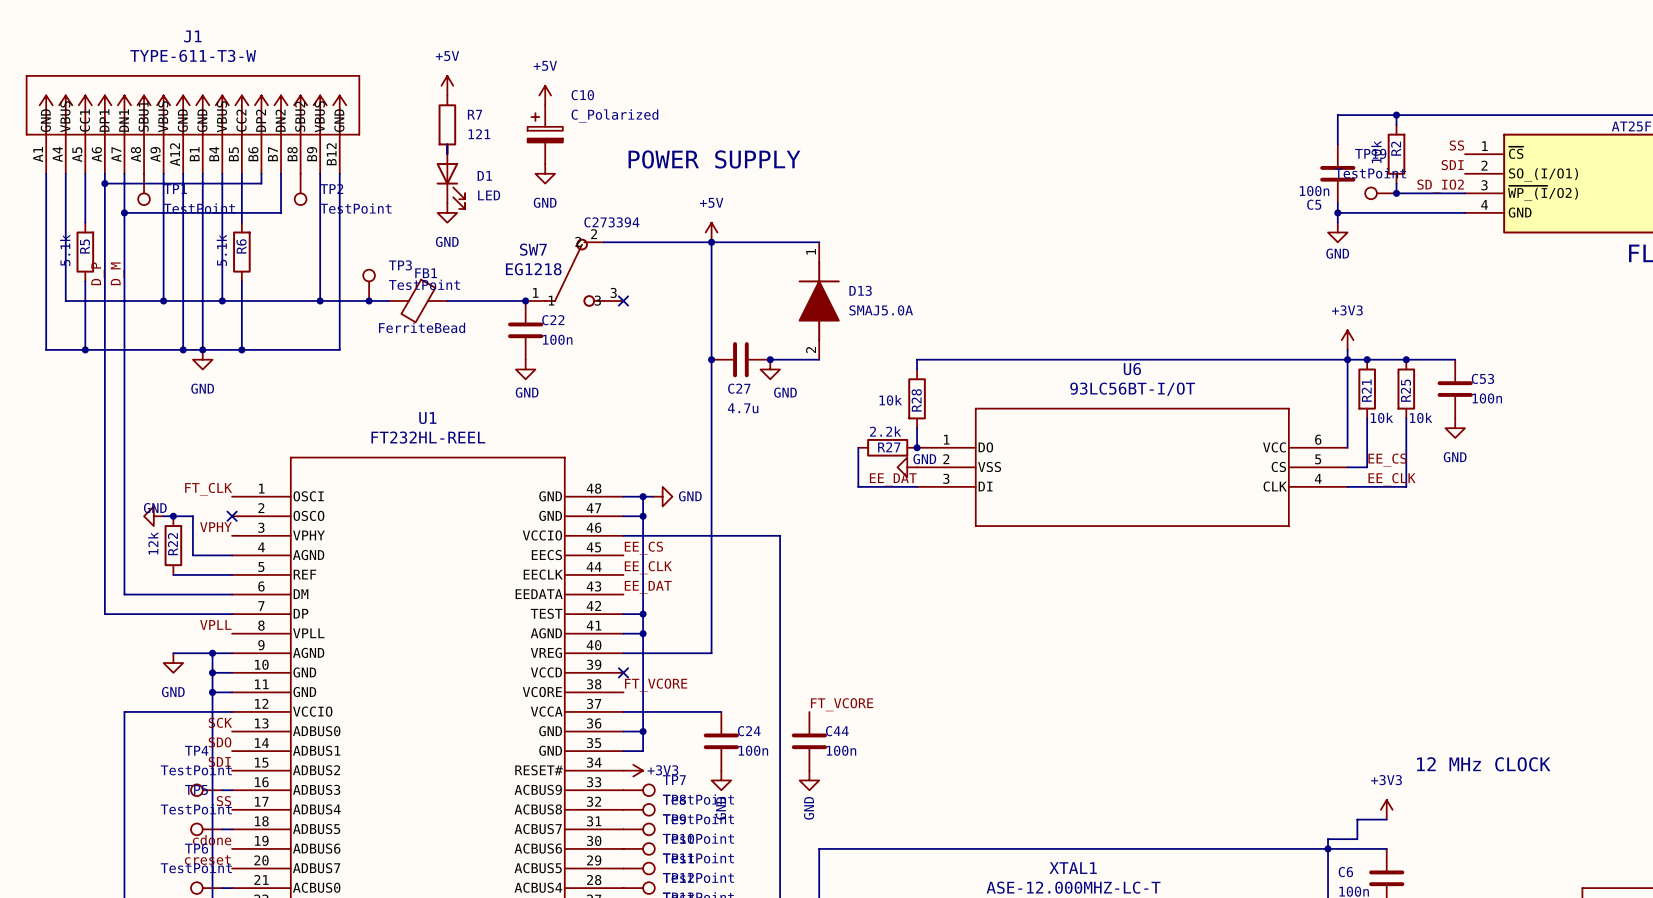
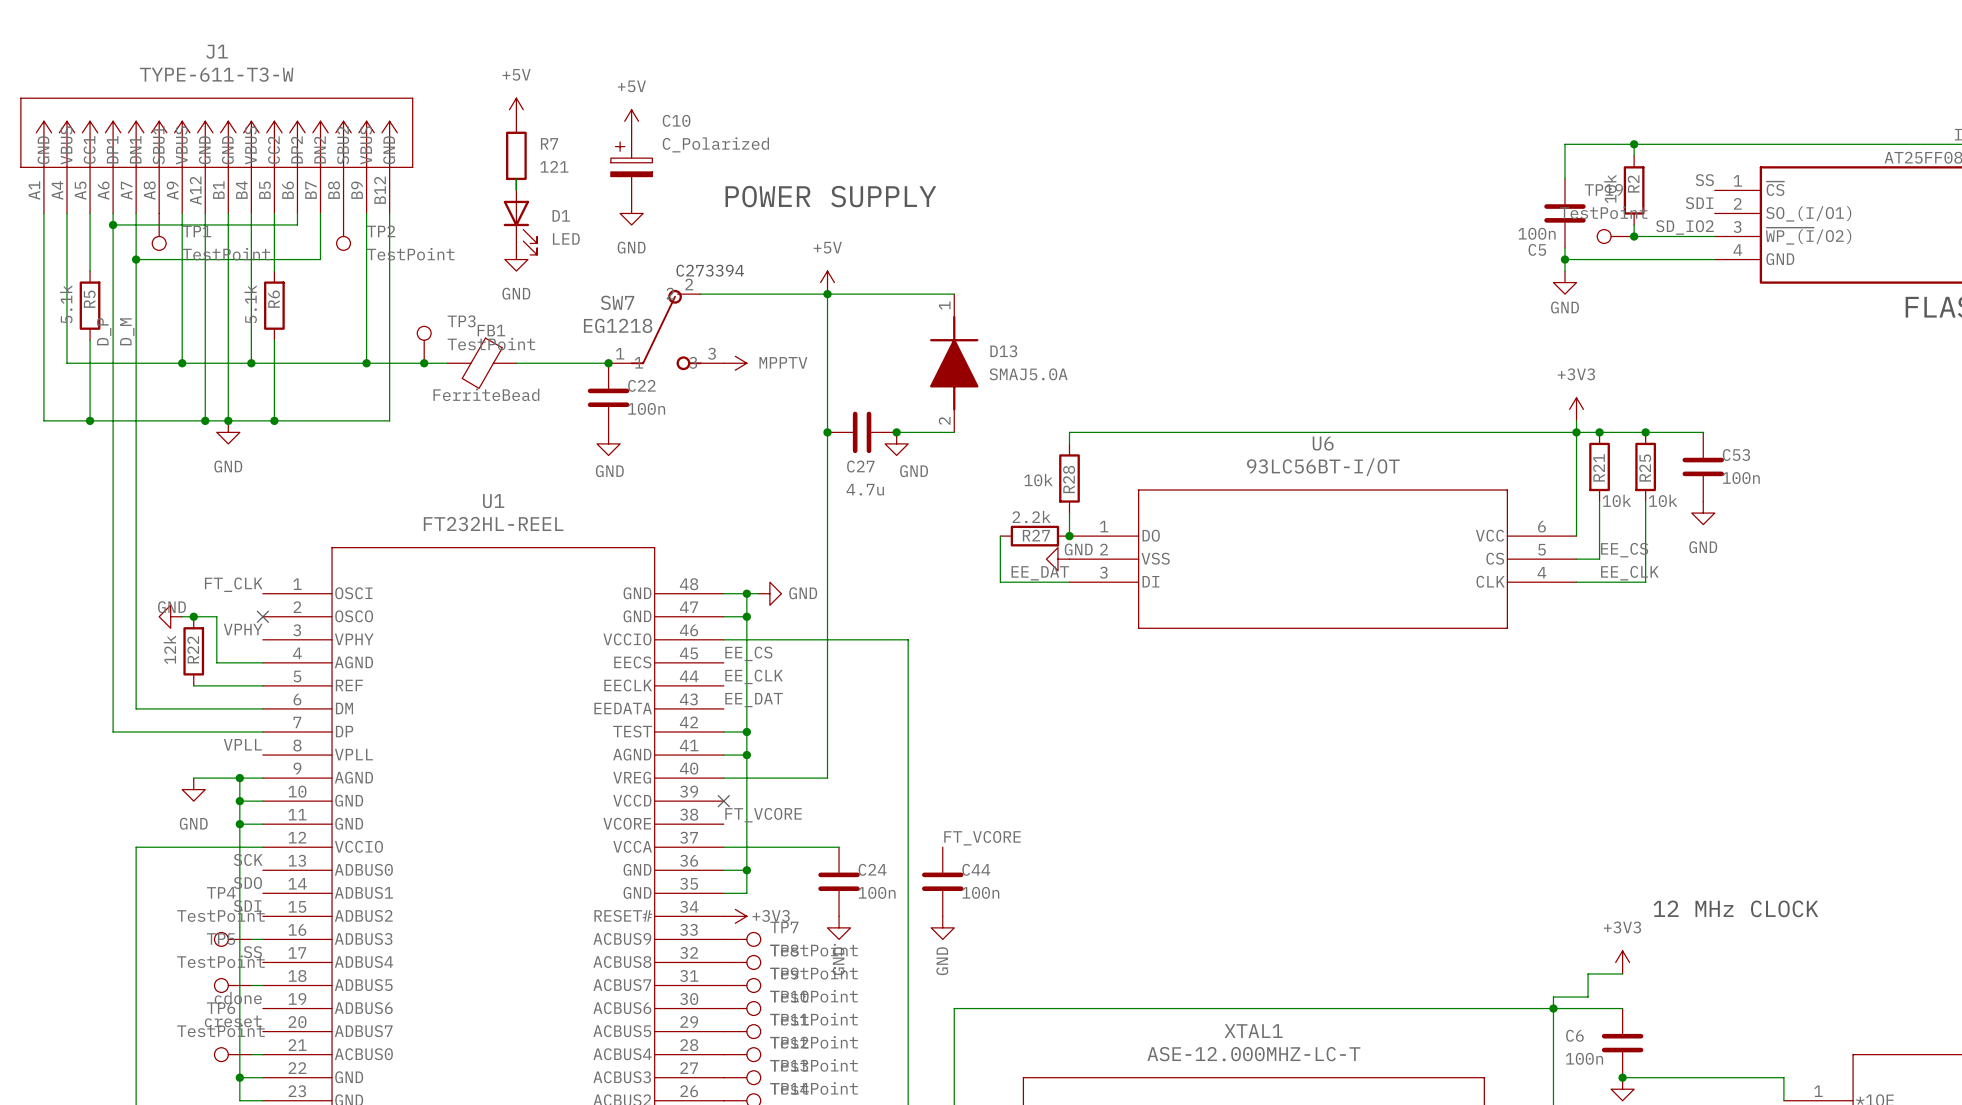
no-connect mark: (623, 300) -> none
power symbol: none -> MPPTV (735, 363)

